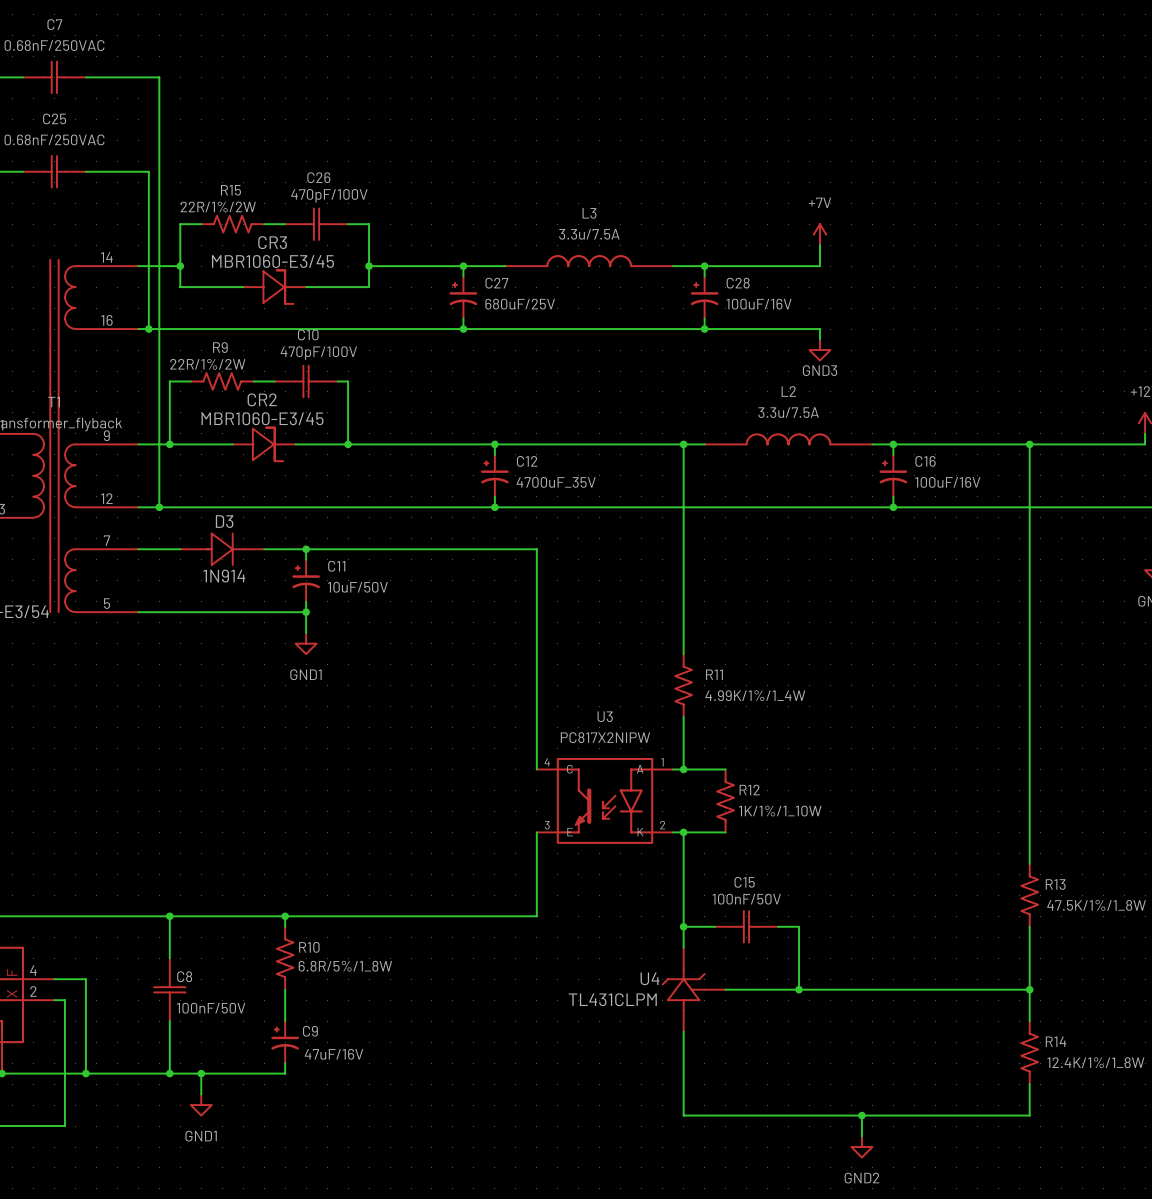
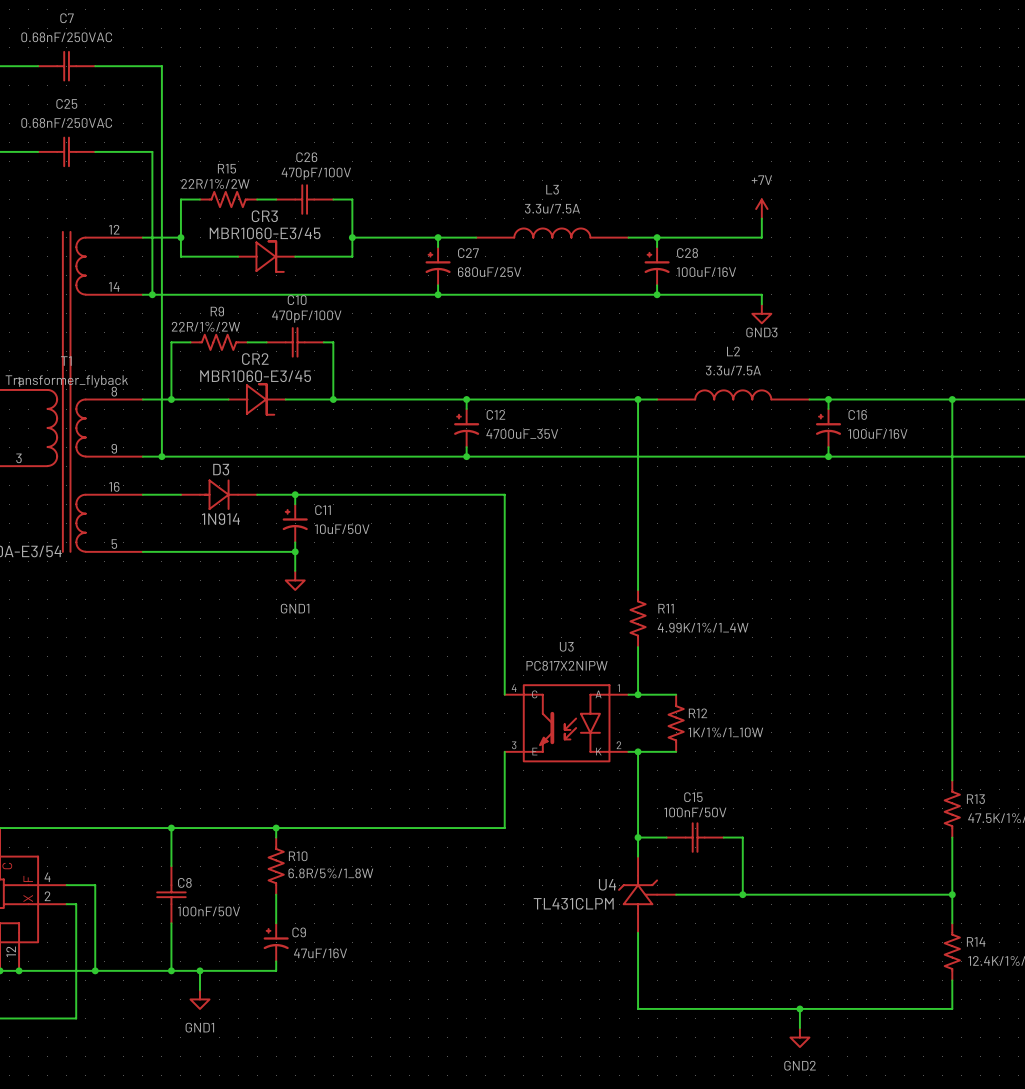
T1 pin number: 14 (106, 257) -> 12 (114, 229)
T1 pin number: 16 (106, 320) -> 14 (114, 286)
T1 pin number: 9 (106, 435) -> 8 (114, 391)
T1 pin number: 12 (106, 498) -> 9 (114, 448)
T1 pin number: 7 (106, 540) -> 16 (114, 486)

